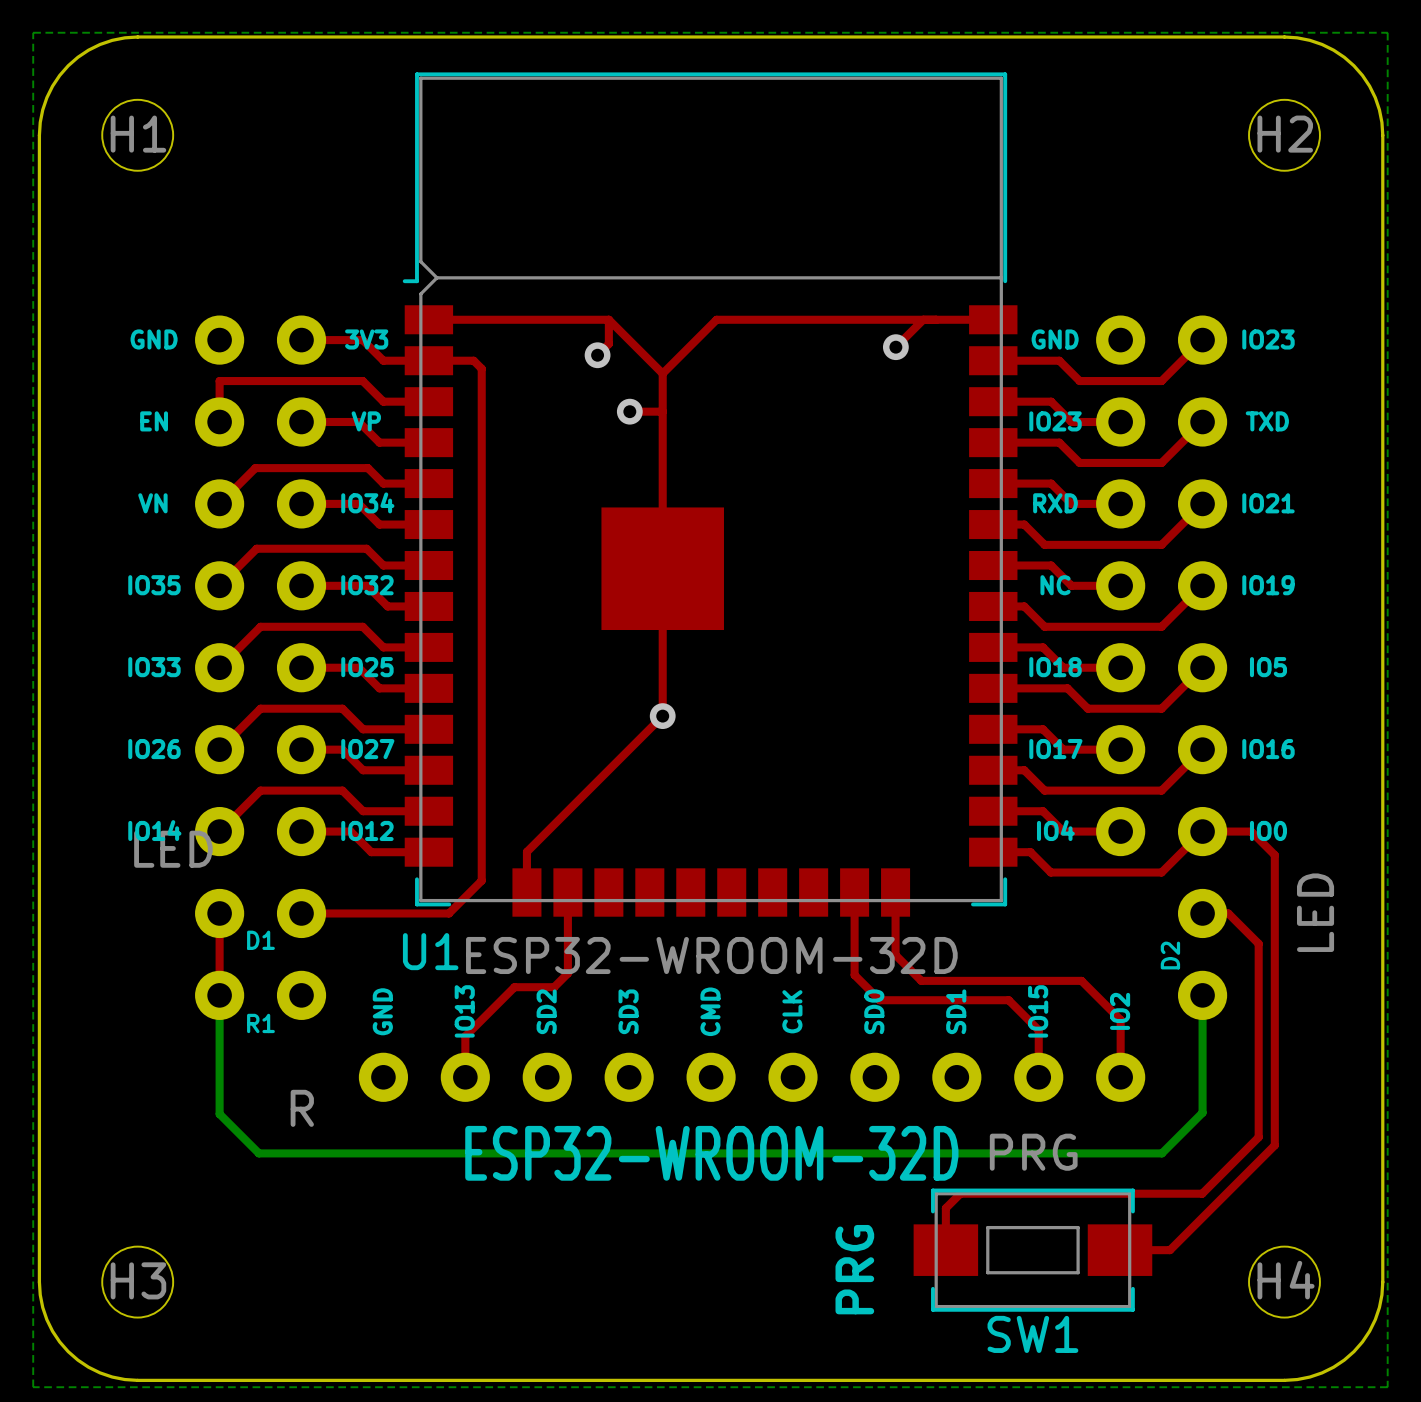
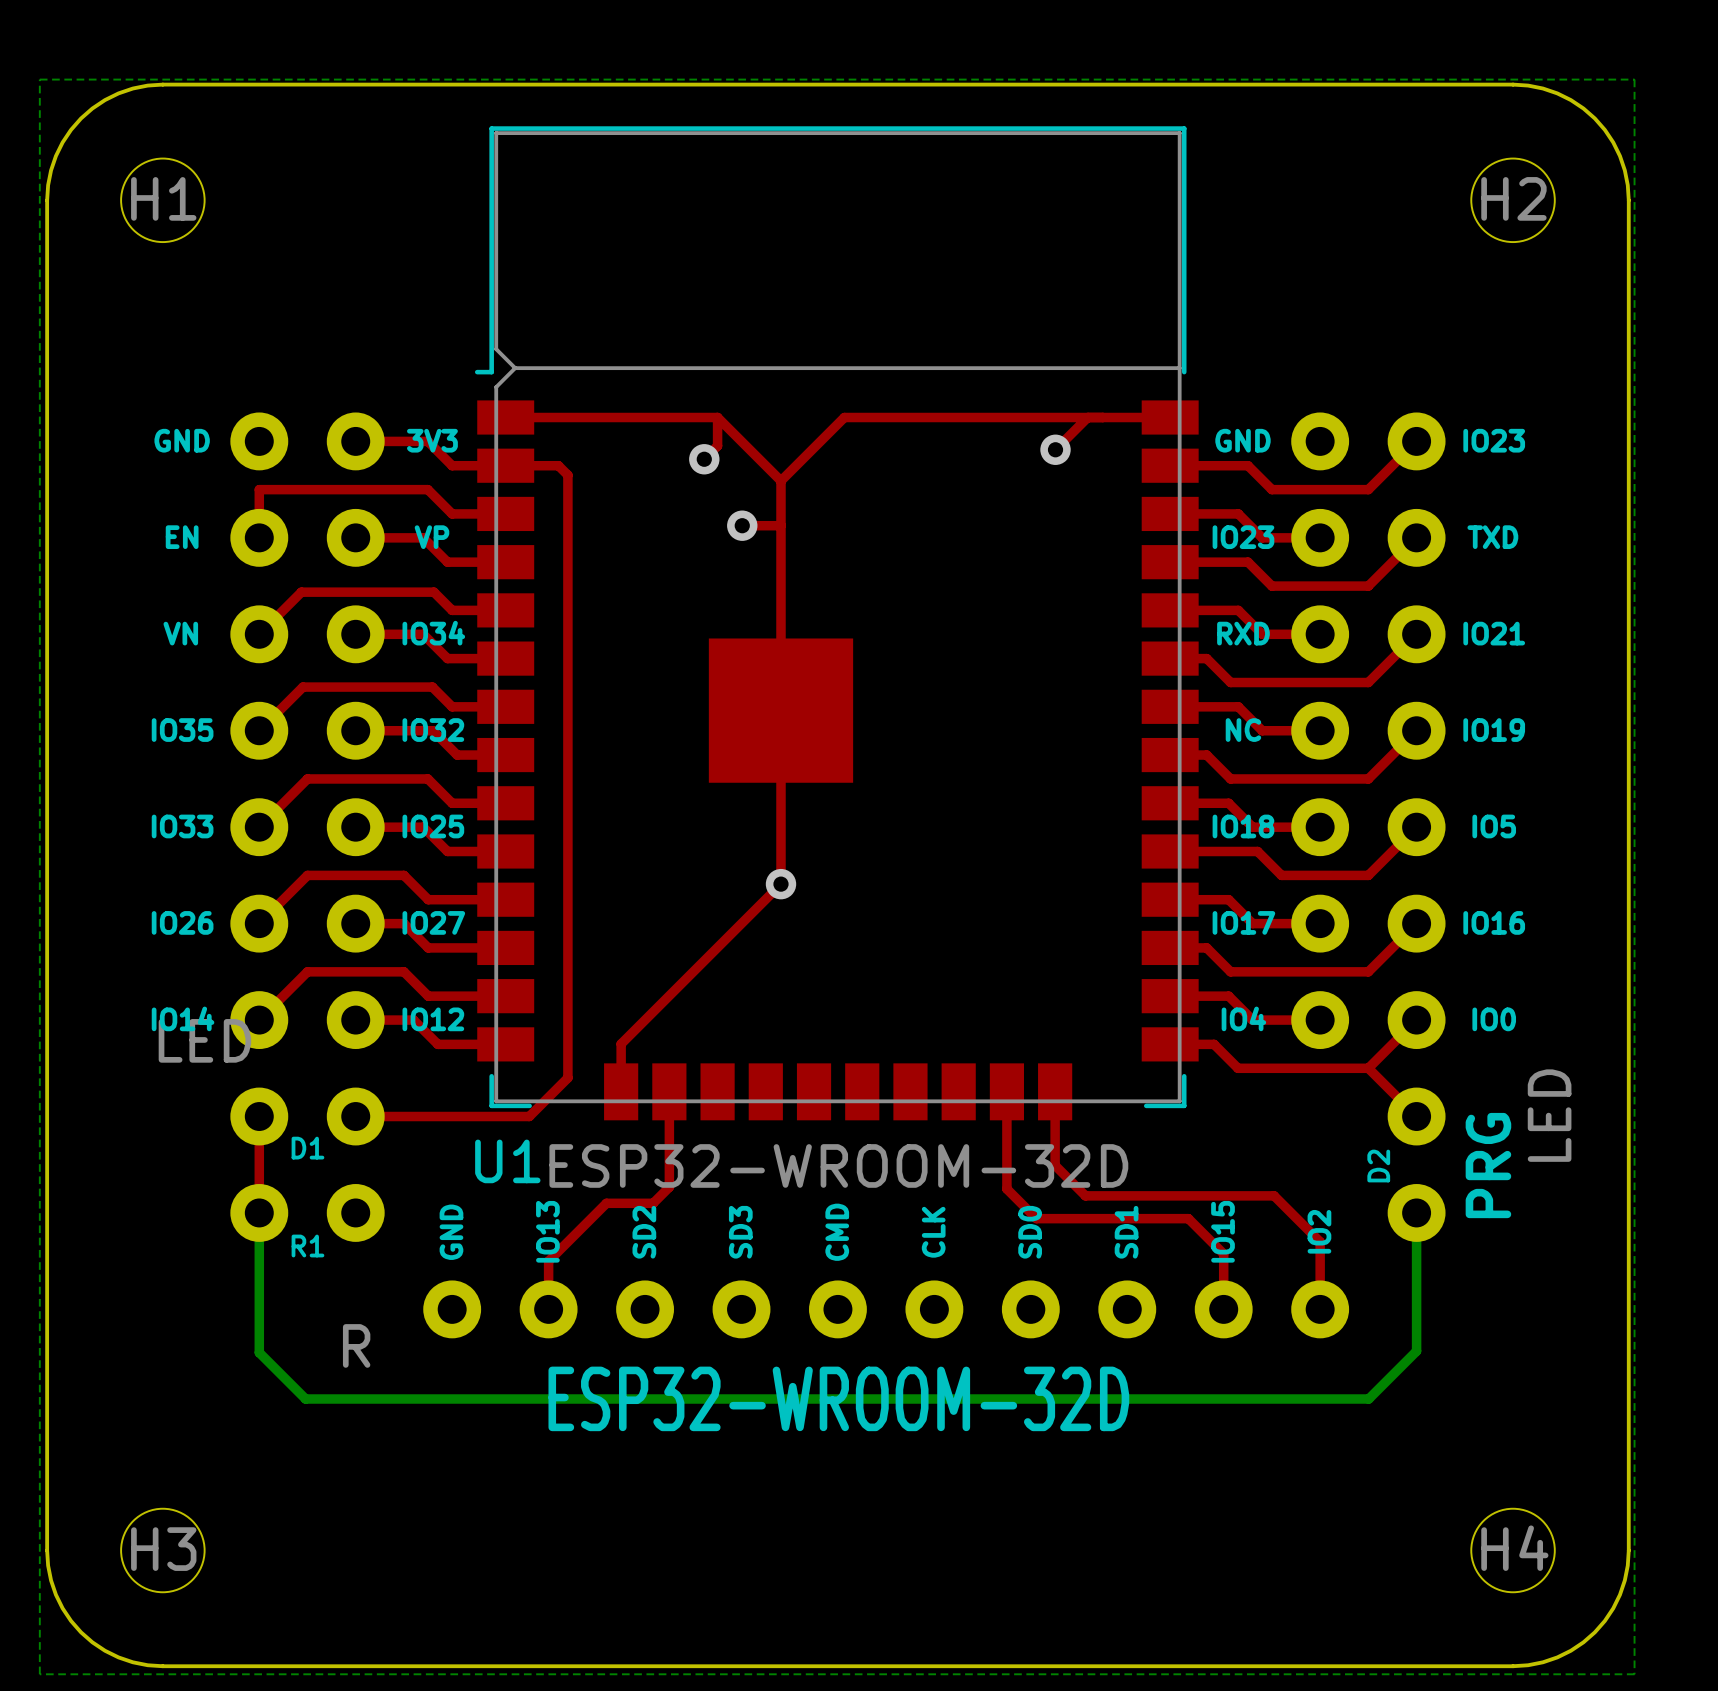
top track: (1202, 831) (1251, 831) (1274, 855) (1274, 1145) (1170, 1250) (1120, 1250) -> none
top track: (1202, 913) (1228, 913) (1258, 943) (1258, 1137) (1202, 1193) (960, 1193) (945, 1208) (945, 1250) -> (1416, 1116) (1368, 1068)
SW1: PRG (1032, 1250) -> none
text position: PRG (854, 1269) -> PRG (1488, 1165)

